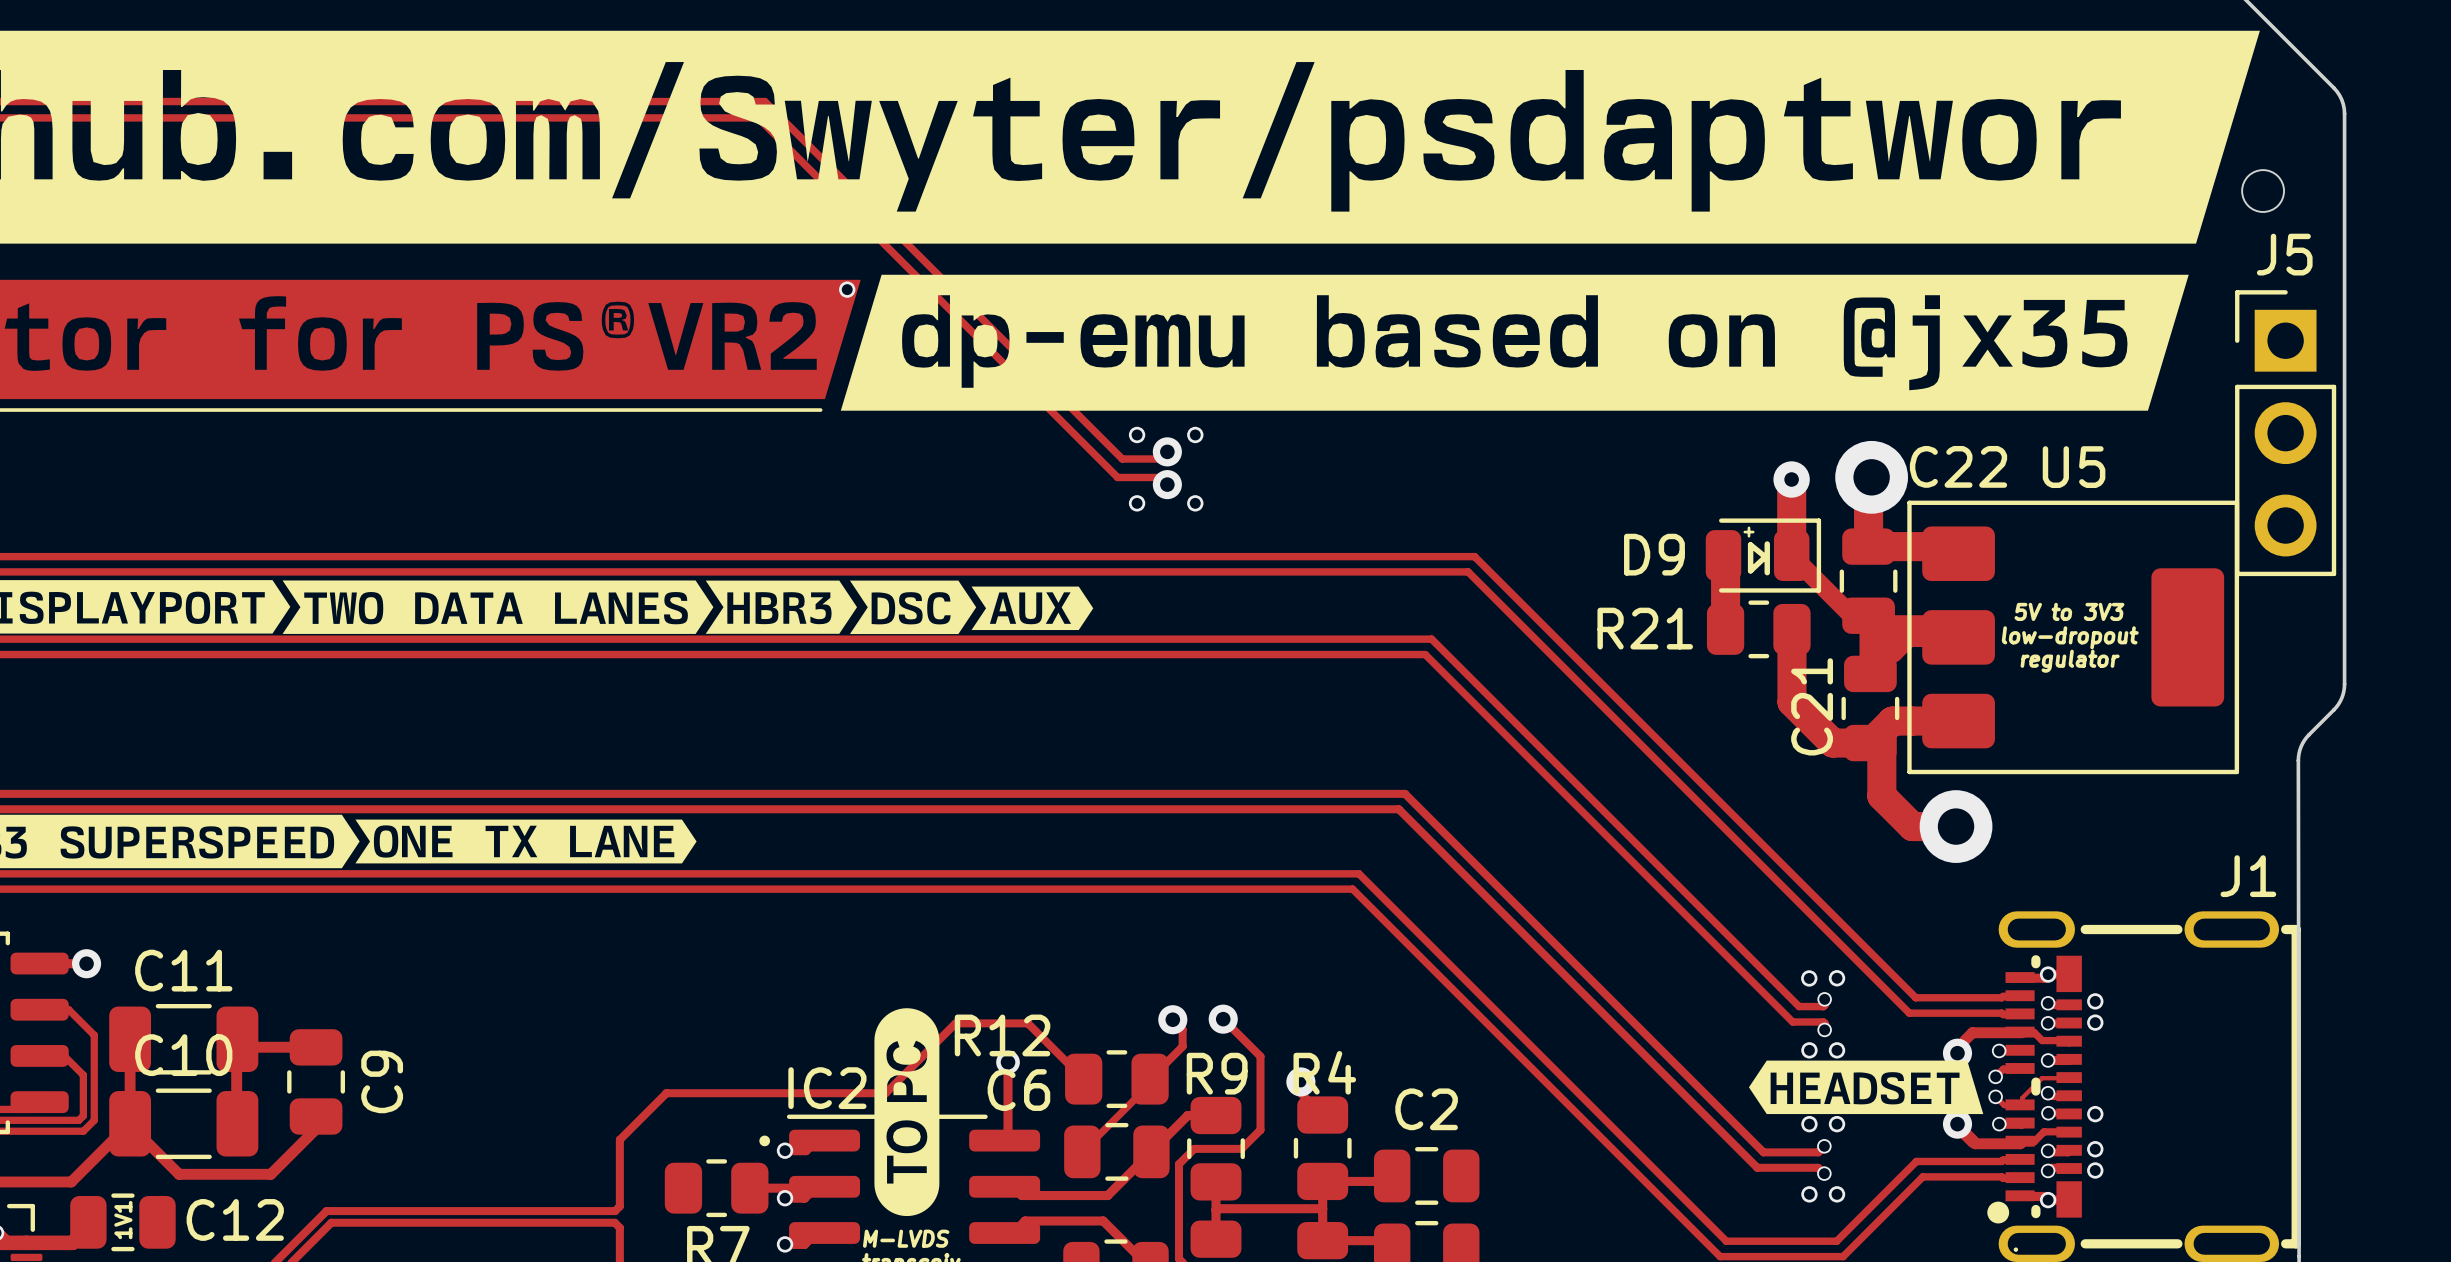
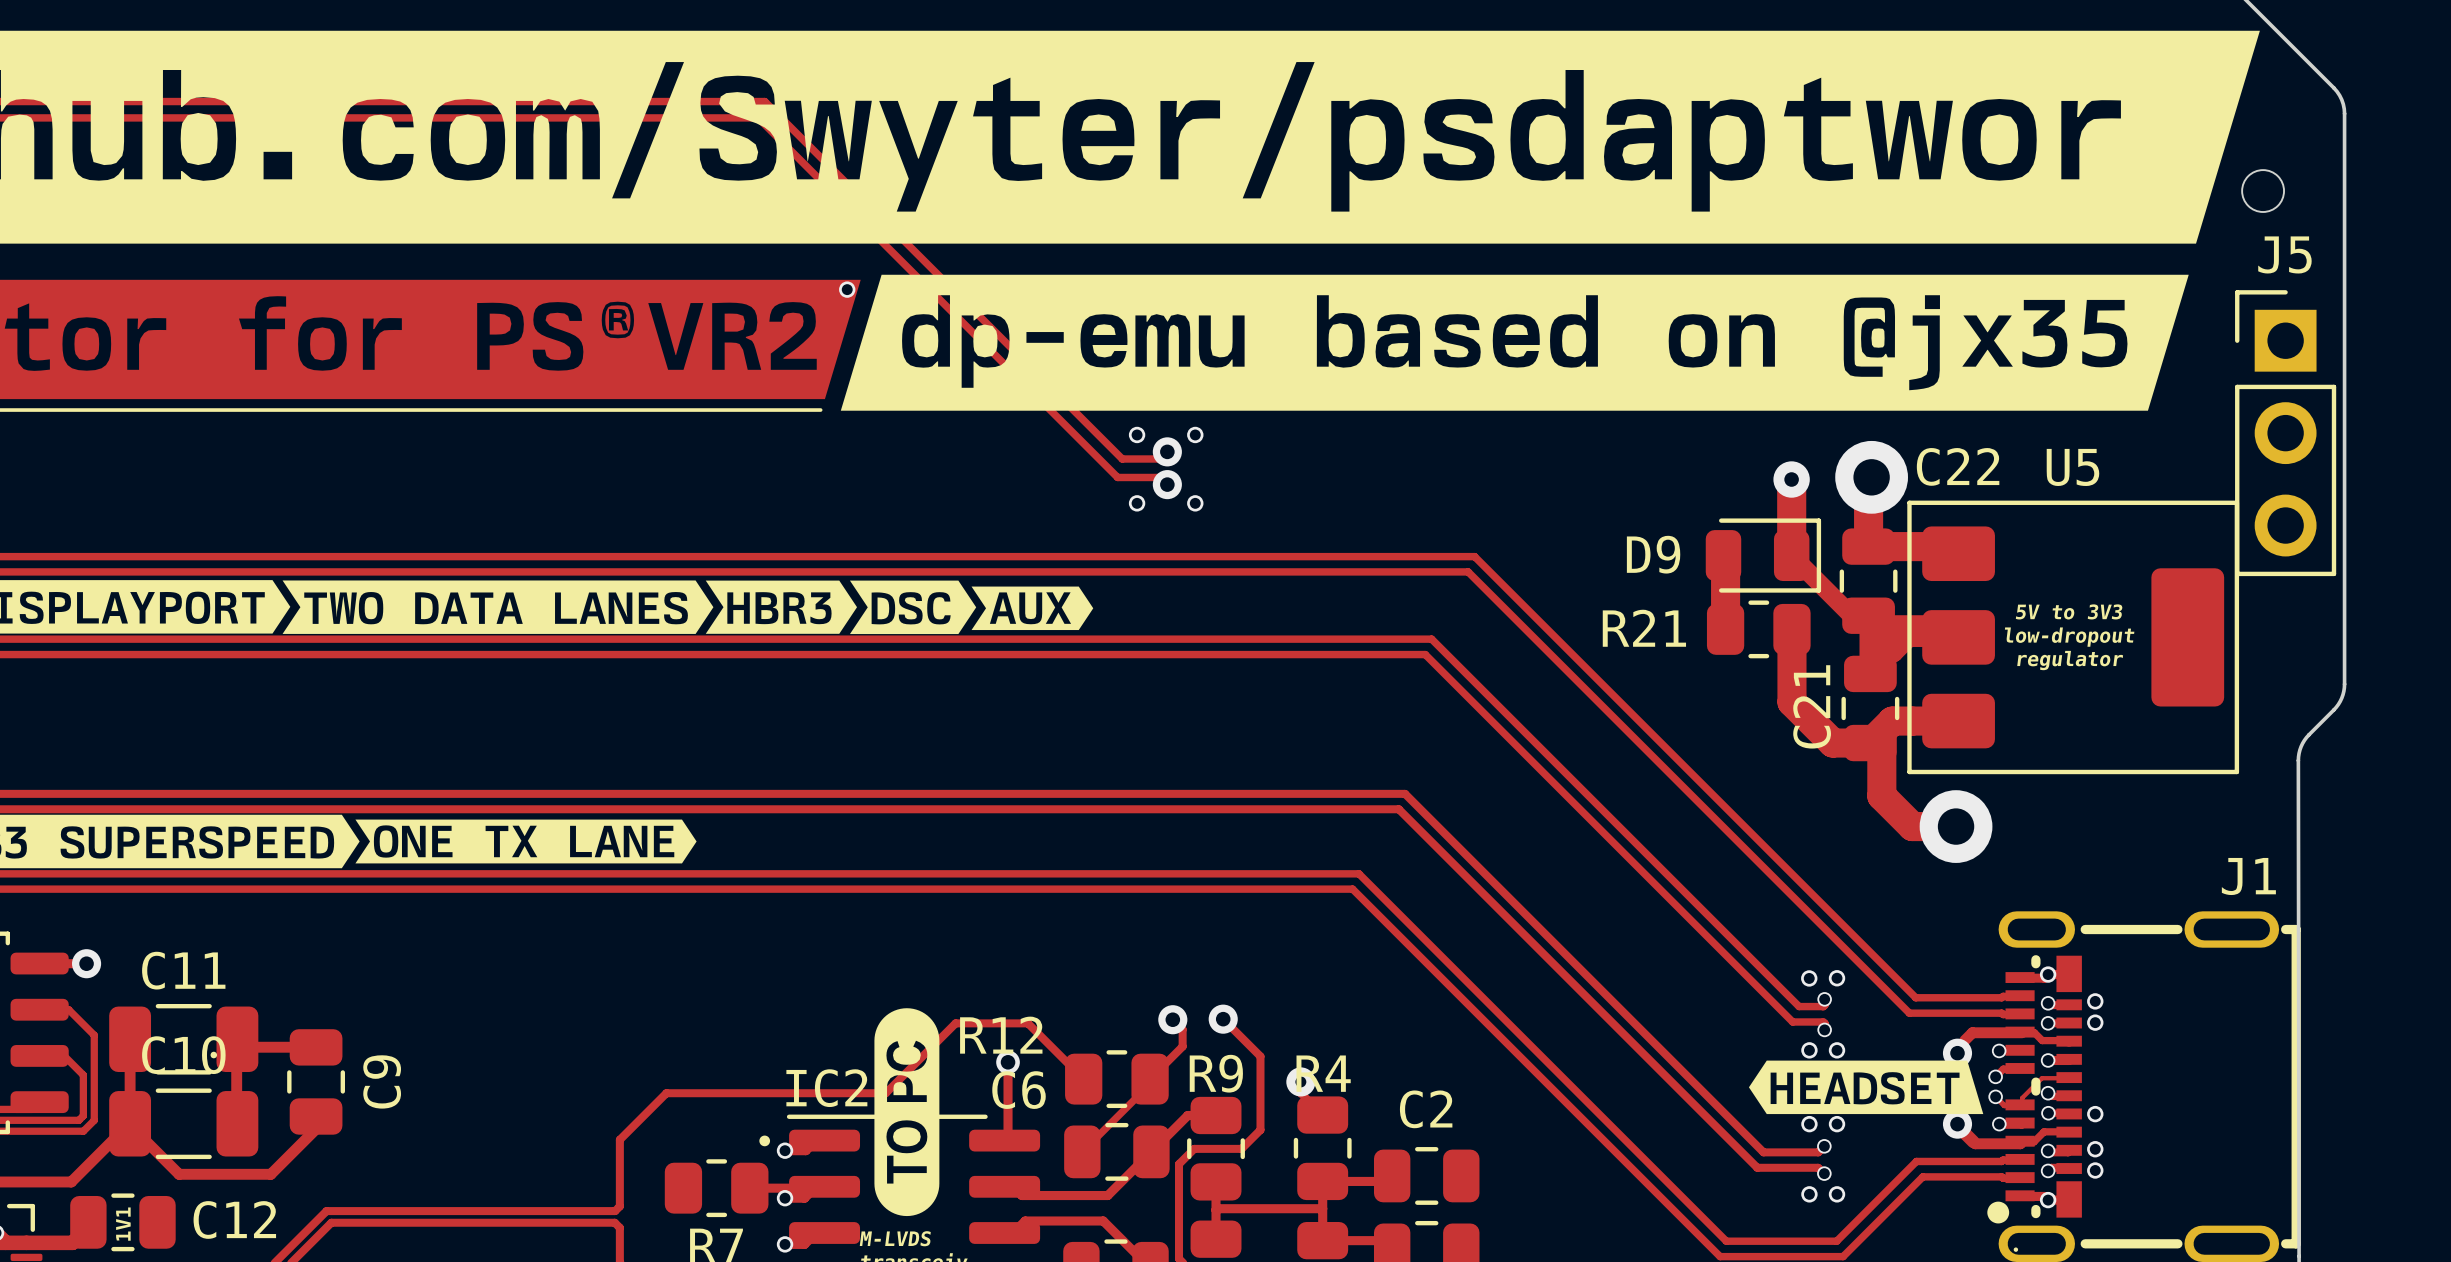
text: + (1749, 532) -> none
line: (1750, 544) (1750, 570) (1765, 556) (1750, 544) -> none
line: (1767, 544) (1767, 572) -> none

